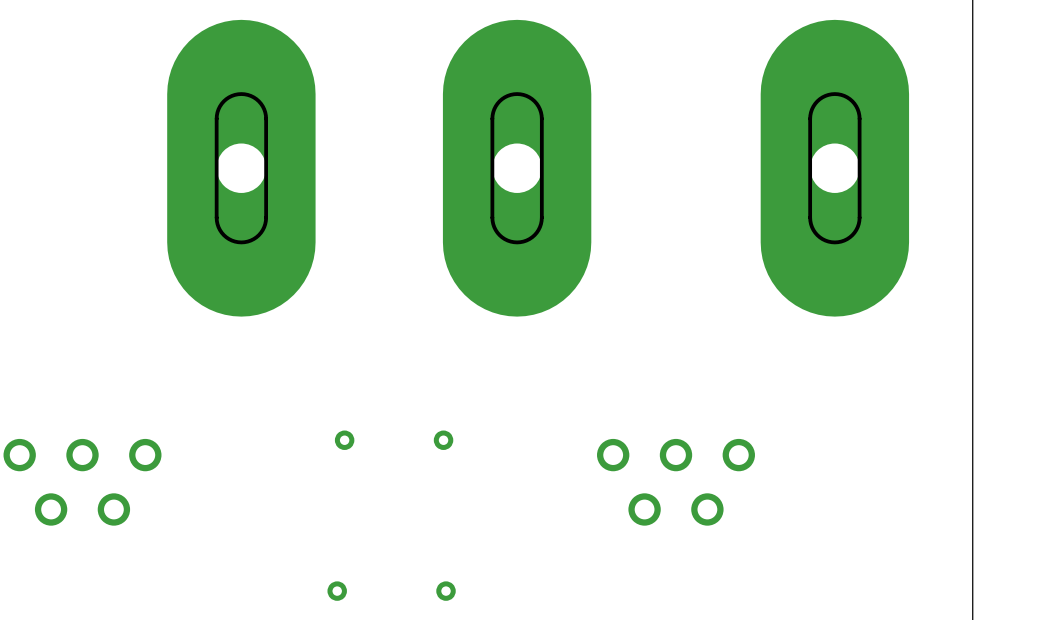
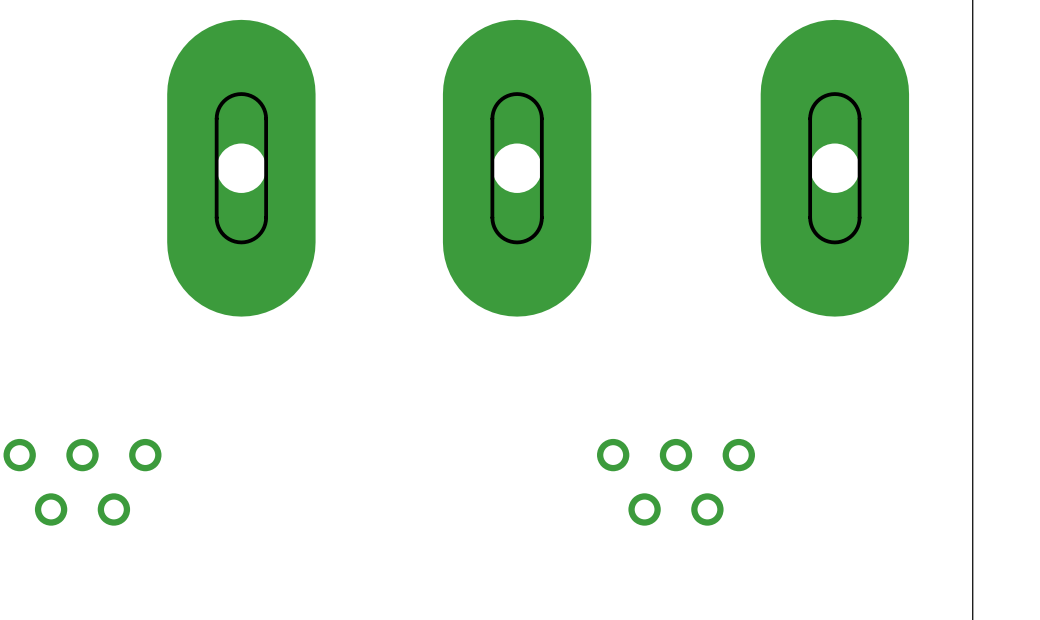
via: (344, 440) -> none
via: (443, 440) -> none
via: (337, 591) -> none
via: (446, 591) -> none

